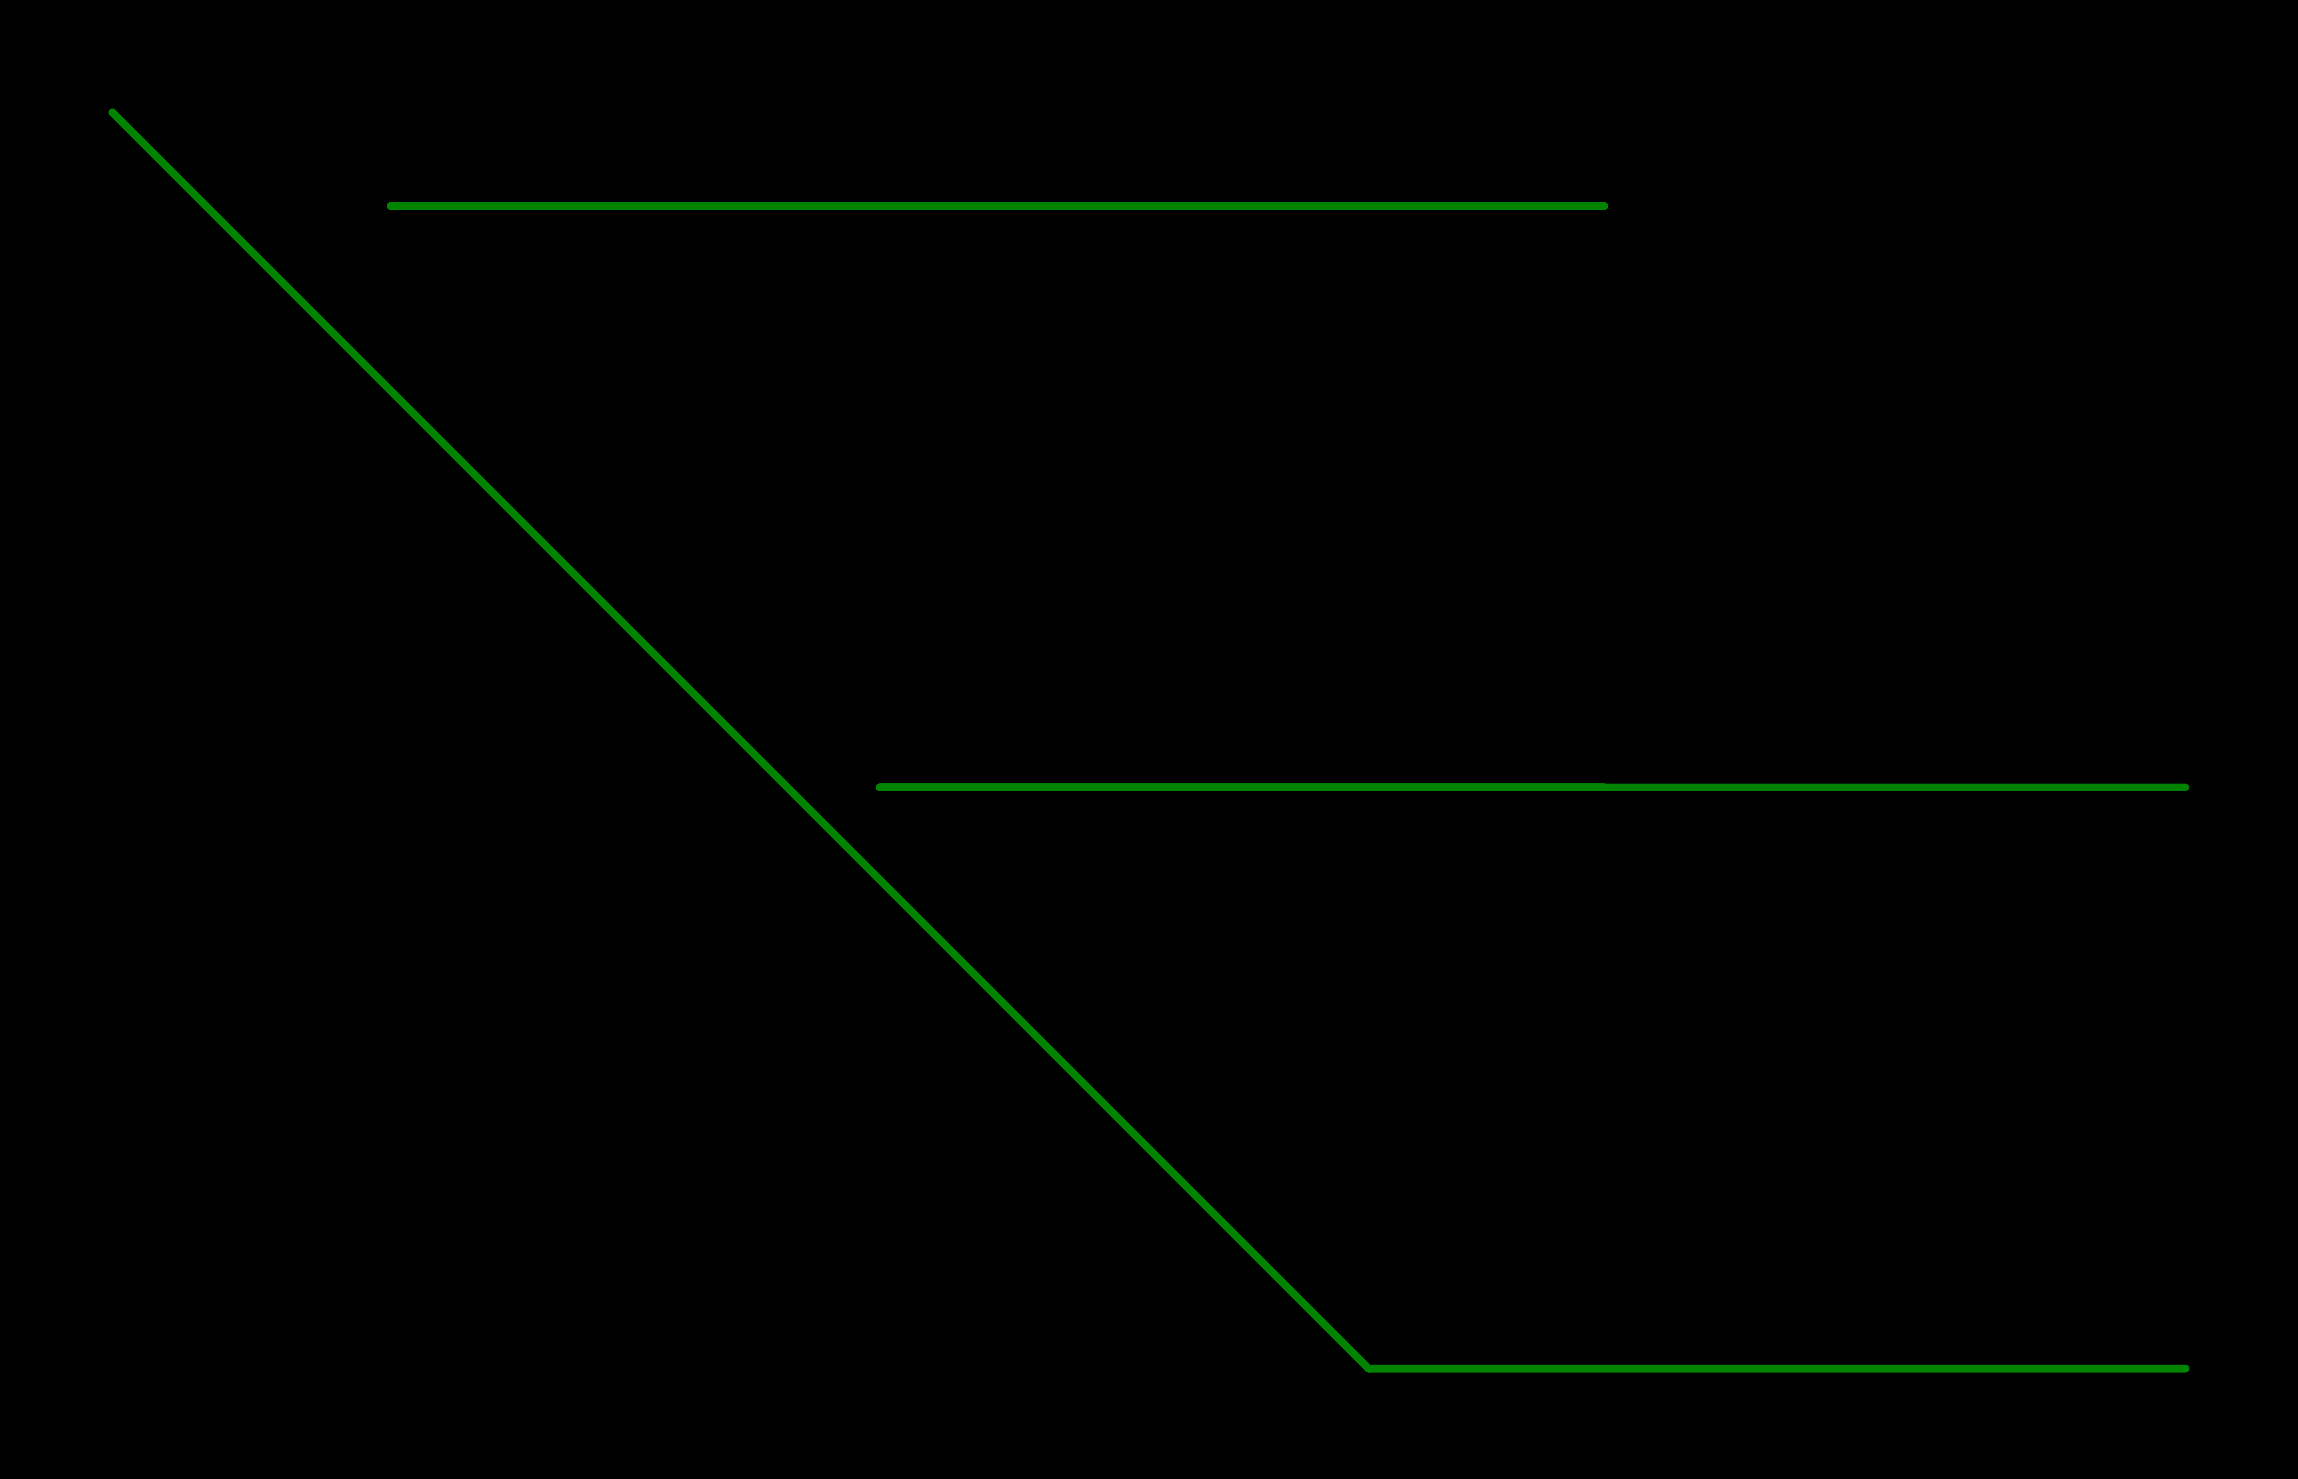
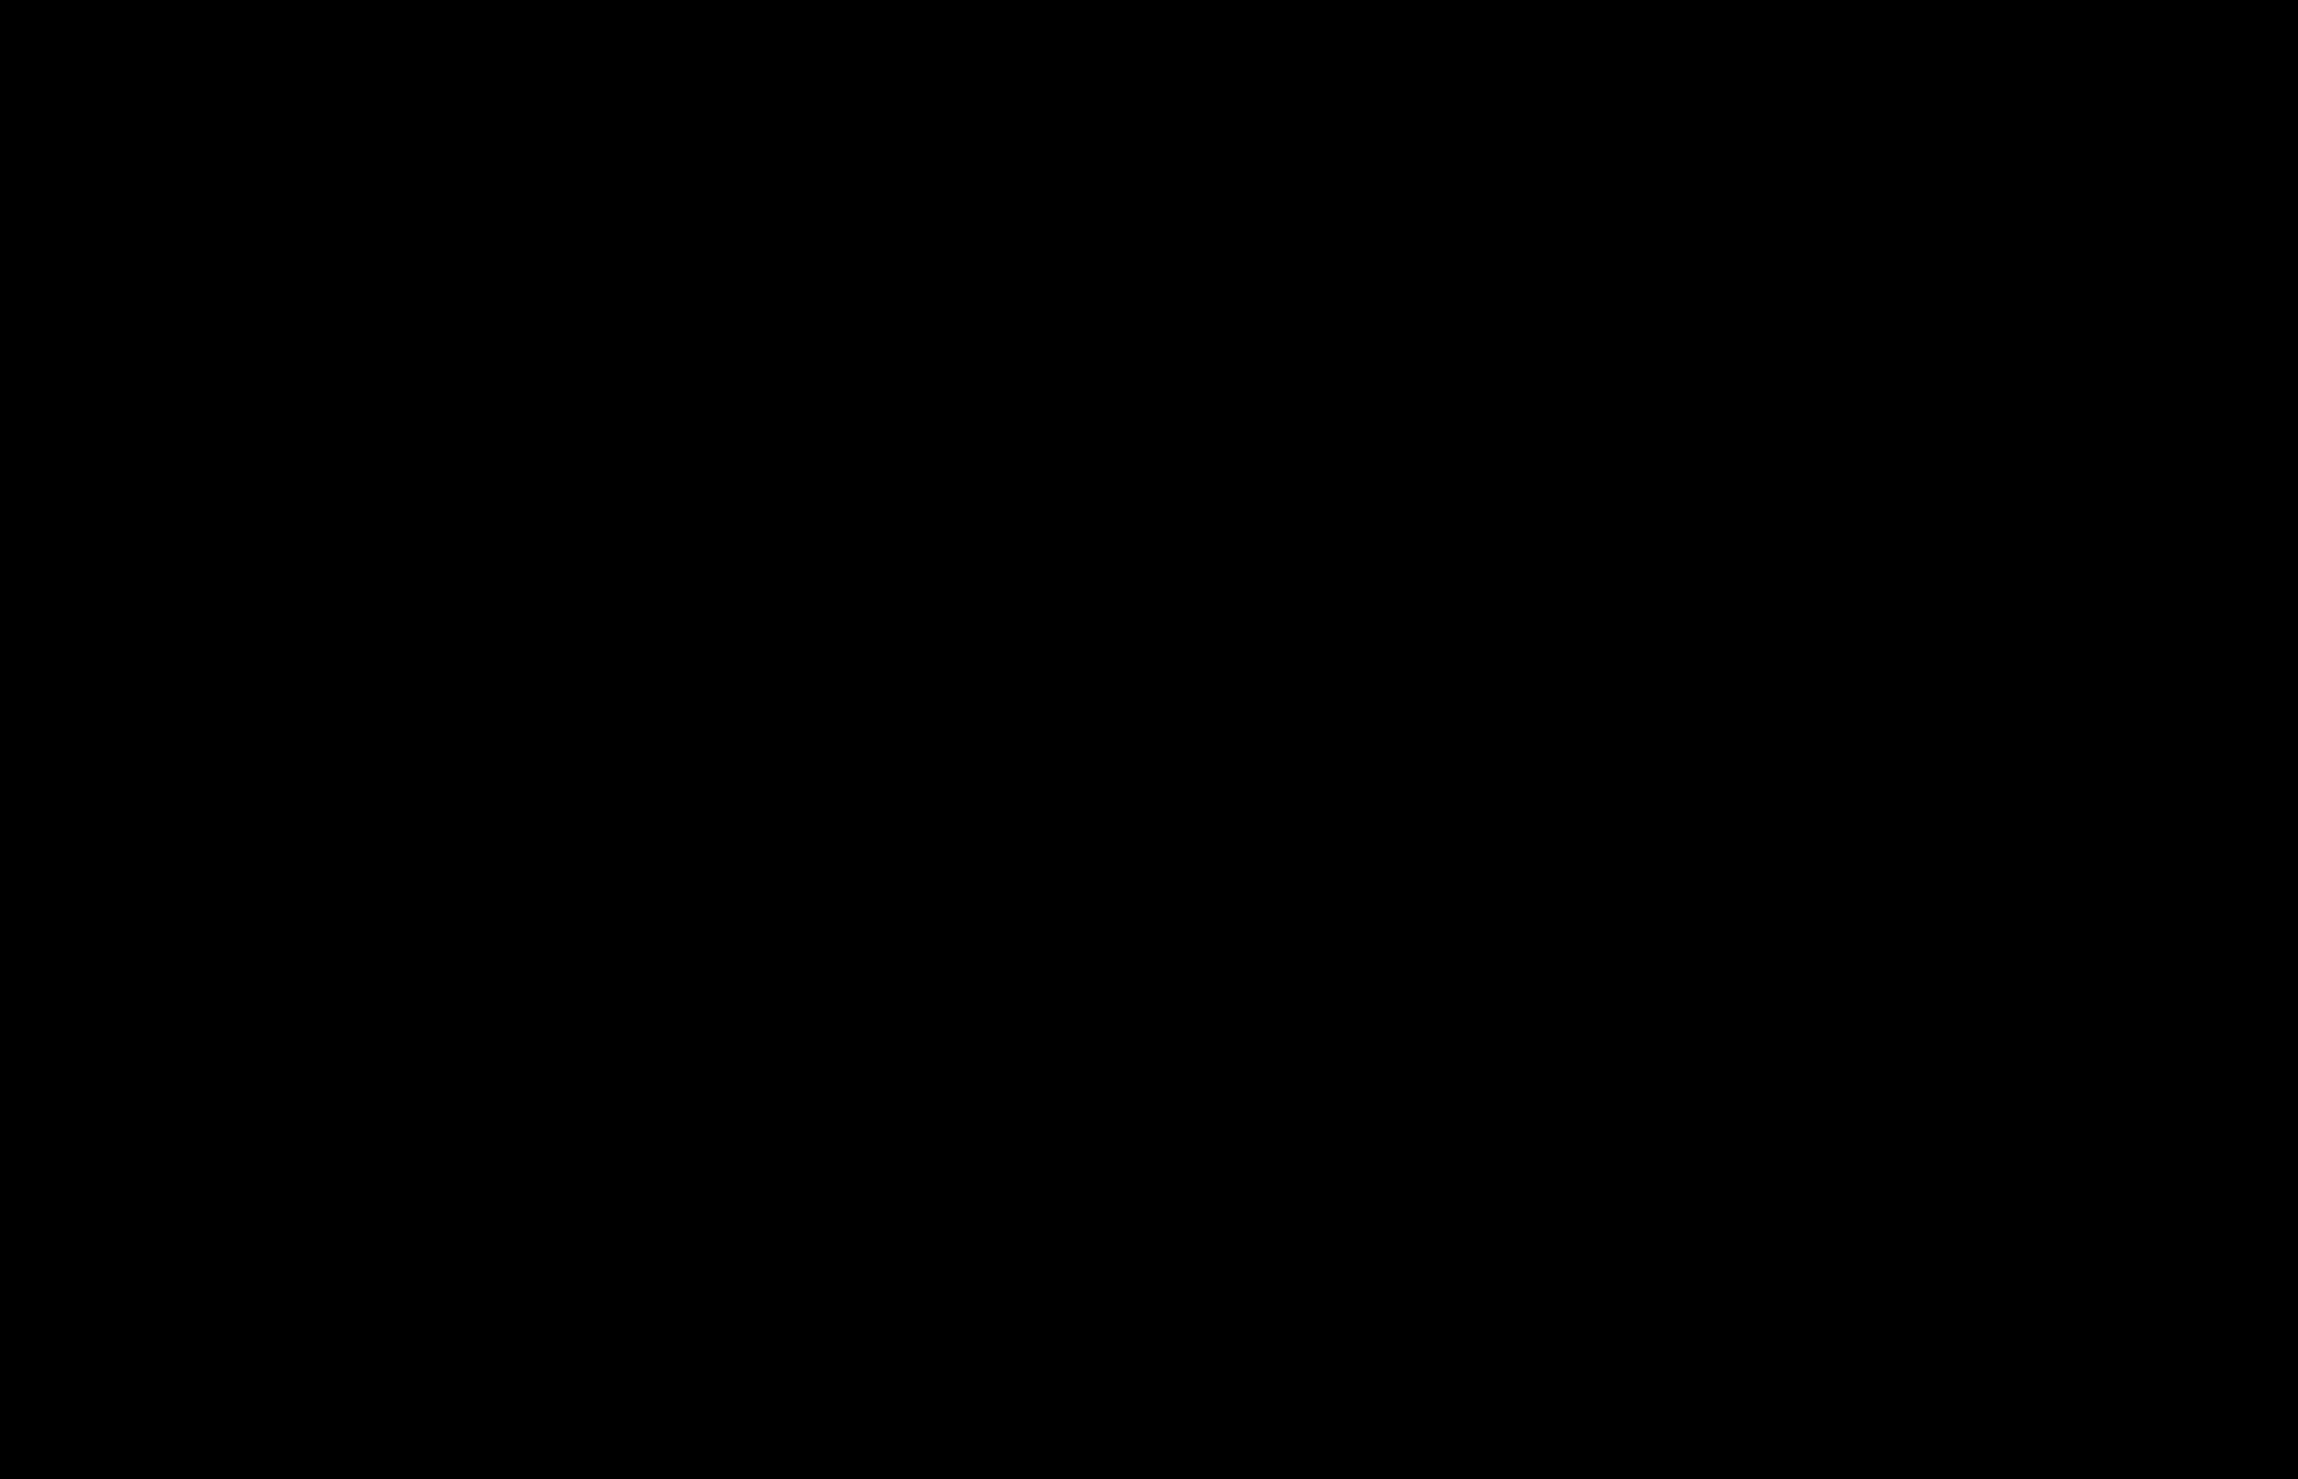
track: (112, 112) (1368, 1368) (2185, 1368) -> none
track: (1604, 206) (390, 206) -> none
track: (2185, 787) (879, 787) -> none

